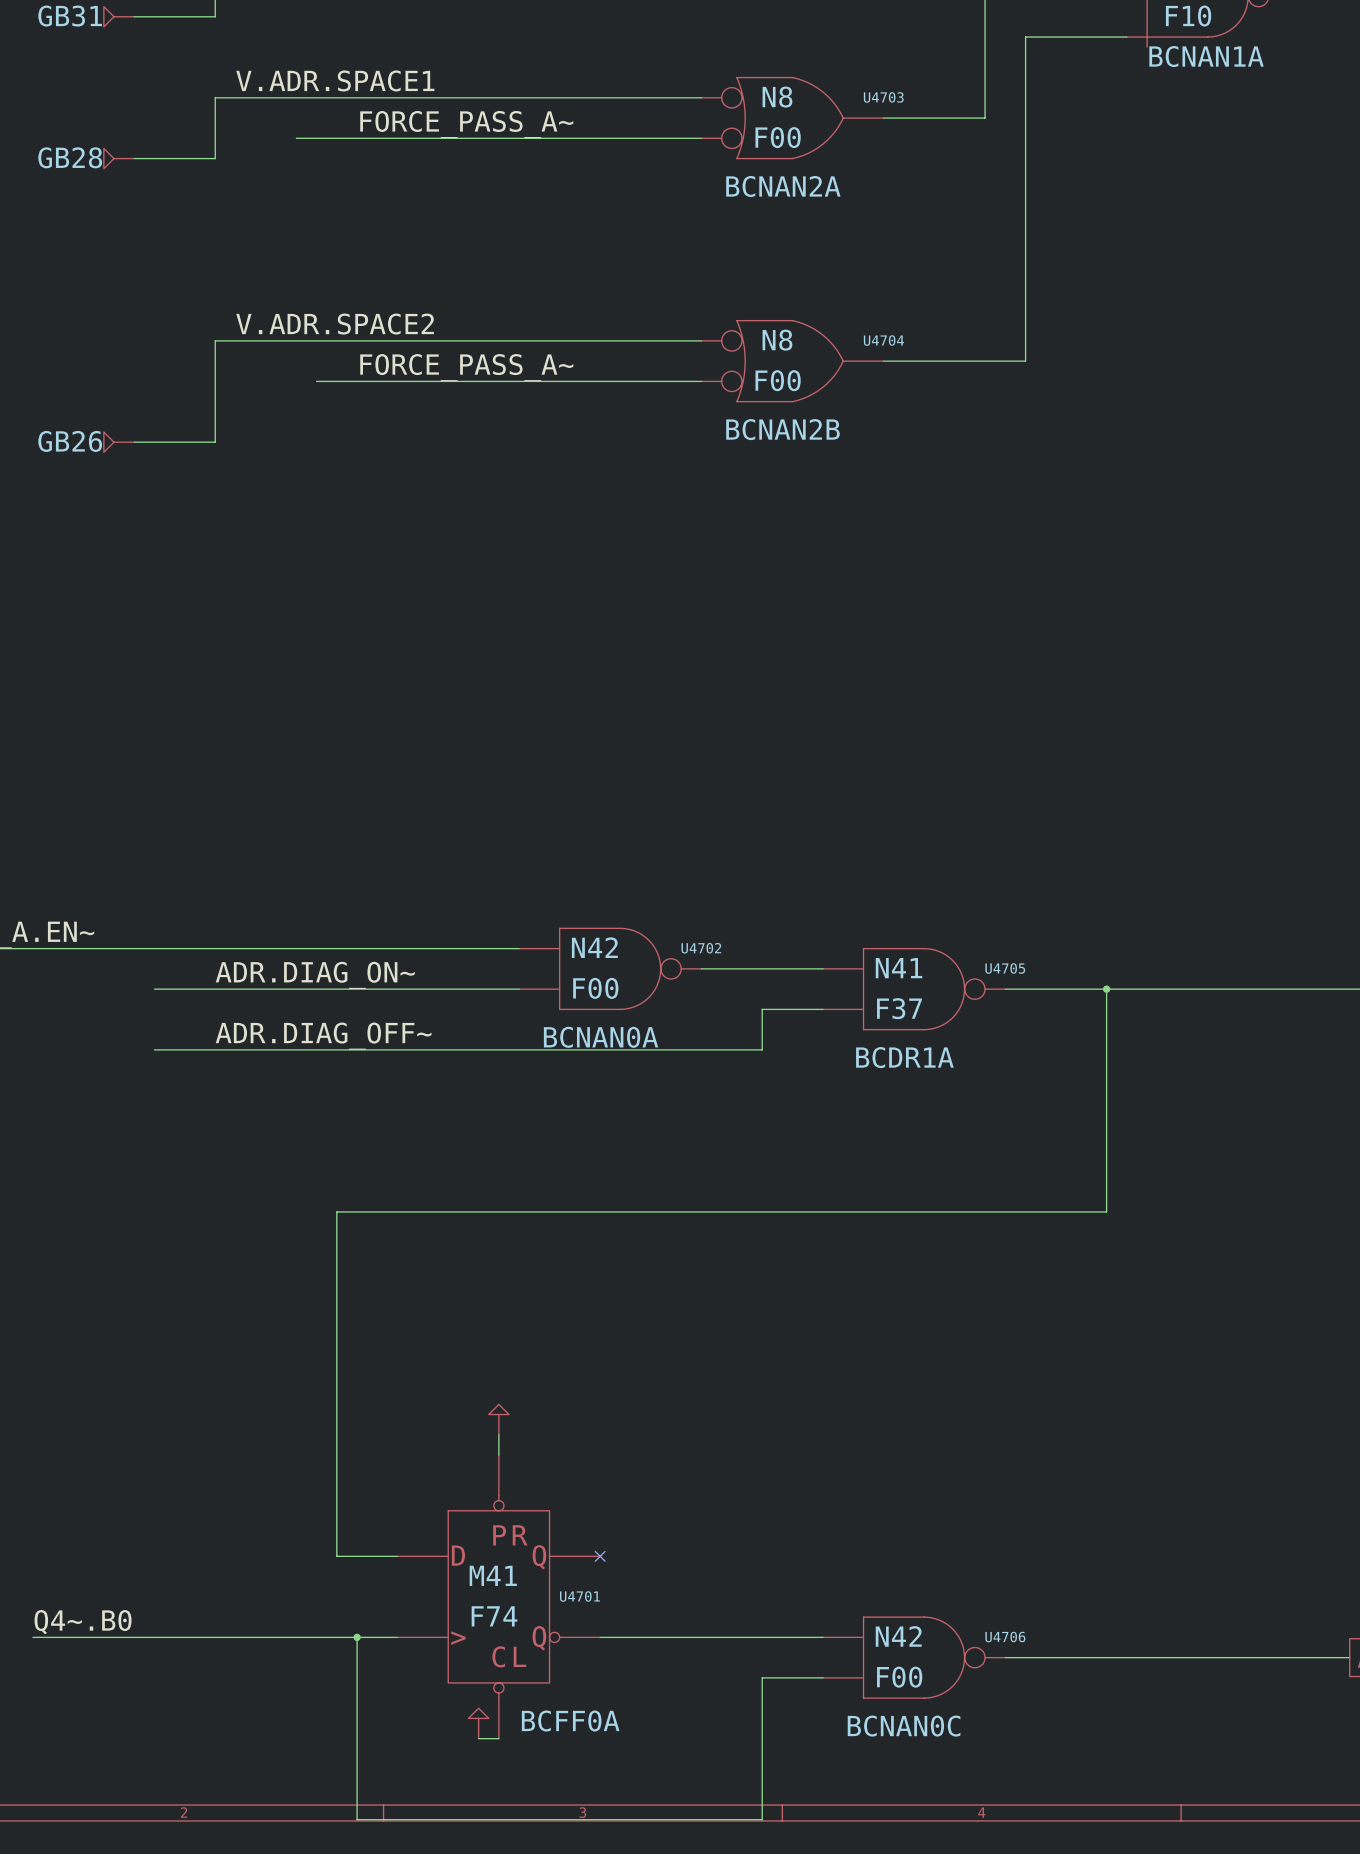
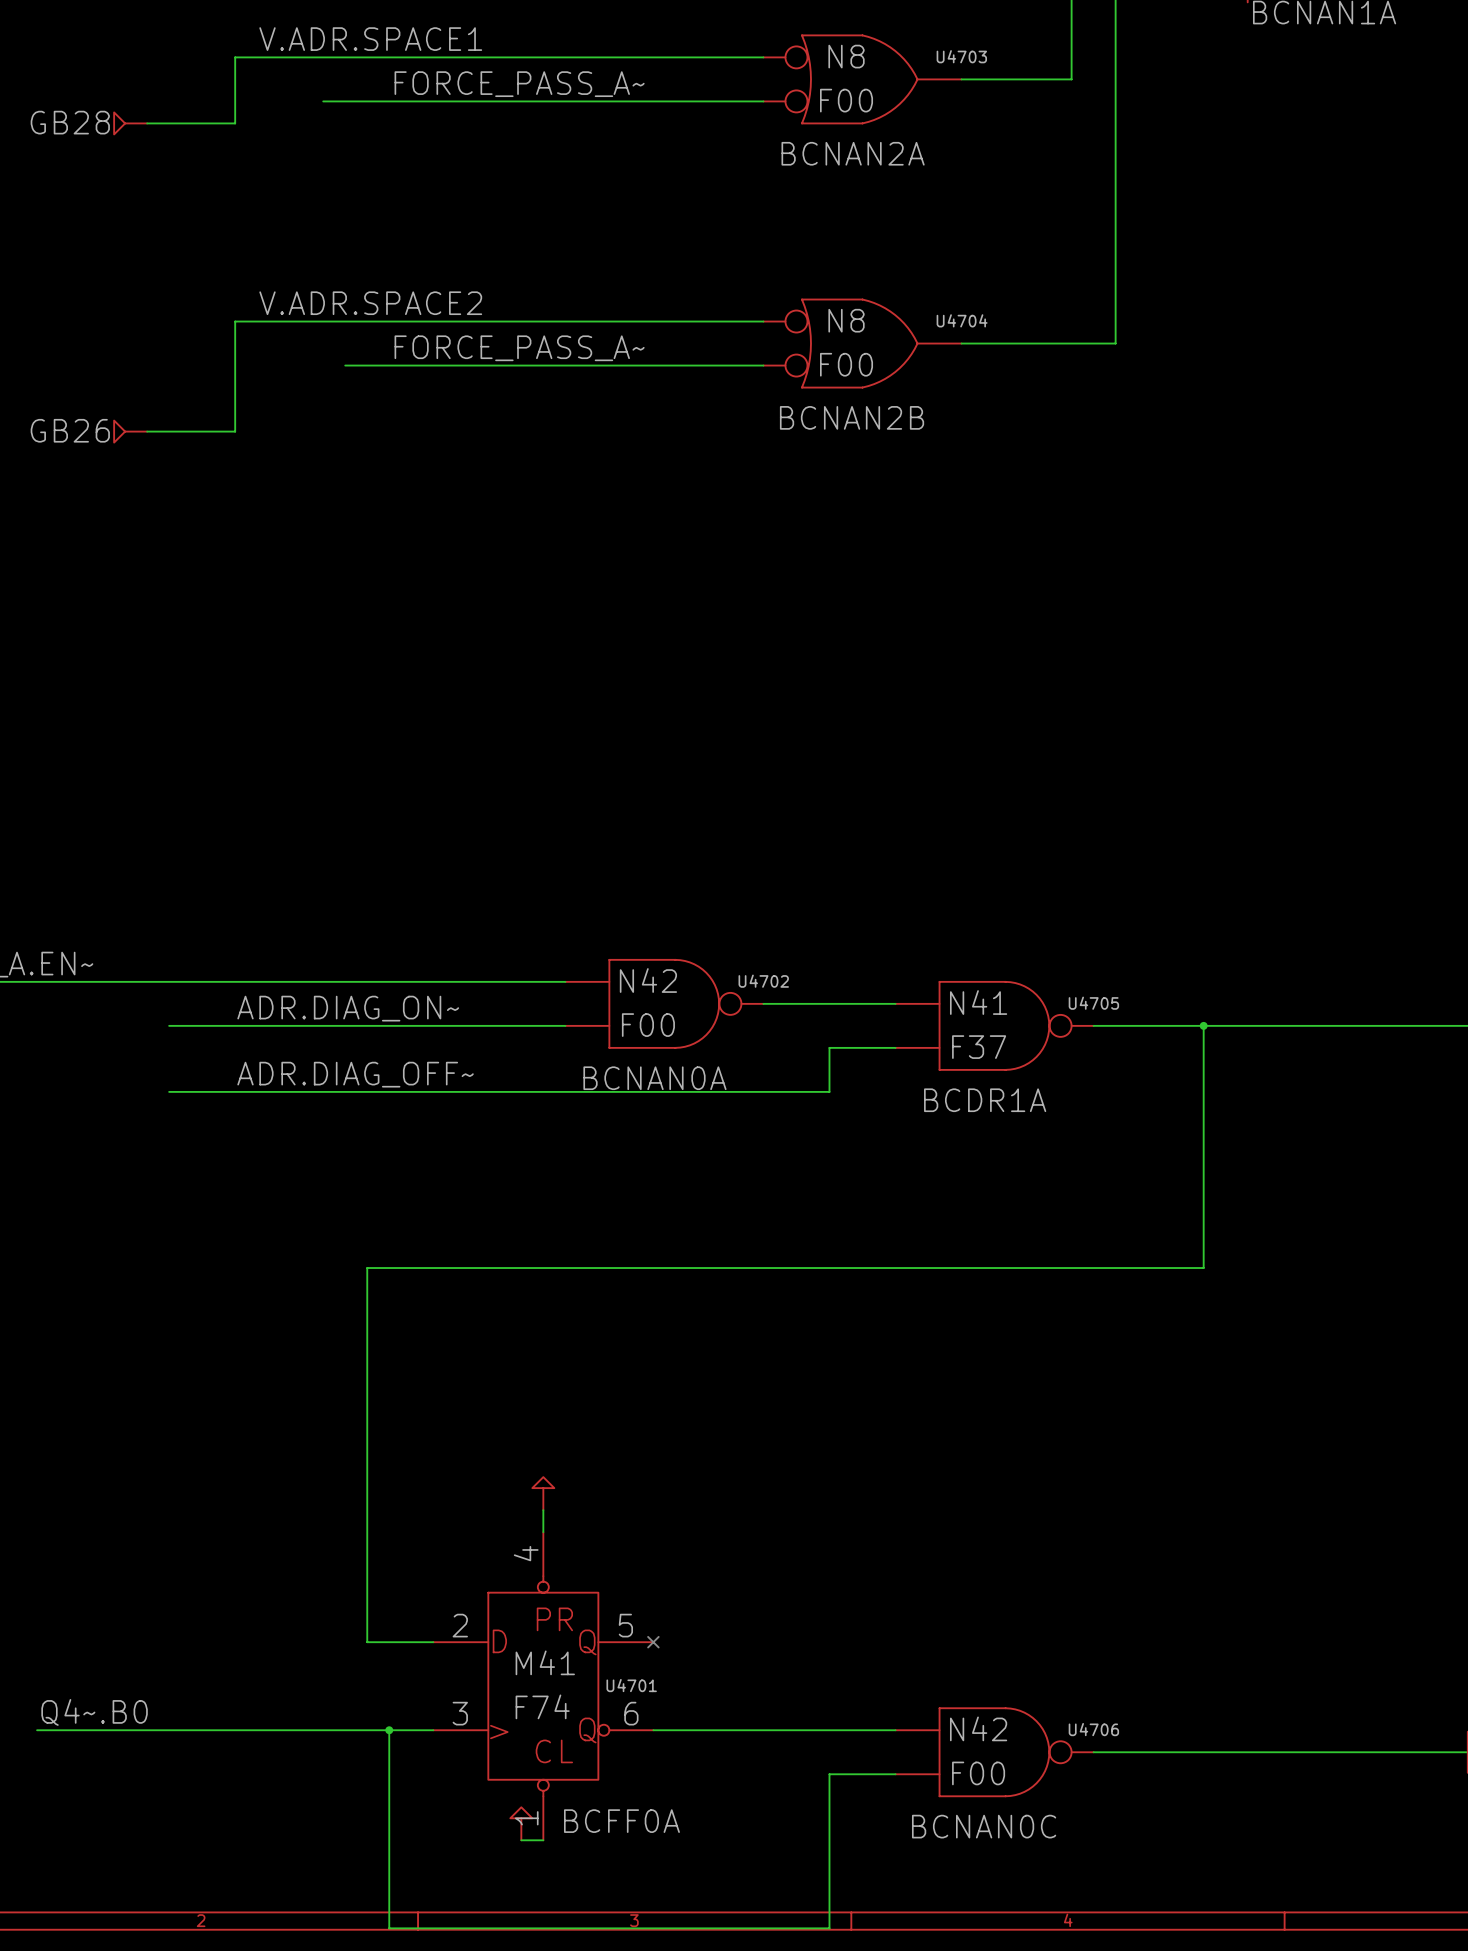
U4701 pin number: none -> 4 (526, 1553)
U4701 pin number: none -> 2 (460, 1625)
U4701 pin number: none -> 5 (625, 1625)
U4701 pin number: none -> 3 (460, 1713)
U4701 pin number: none -> 6 (631, 1713)
U4701 pin number: none -> 1 (526, 1818)

